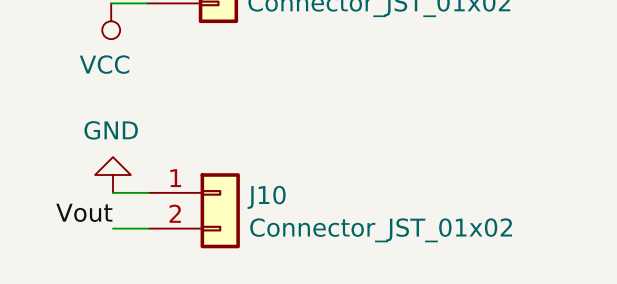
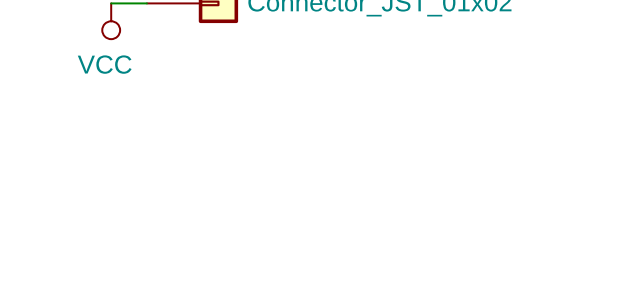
power symbol: GND (112, 175) -> none
wire: (112, 192) (148, 192) -> none
J10: Connector_JST_01x02 (194, 210) -> none
label: Vout (84, 212) -> none
wire: (112, 228) (148, 228) -> none

